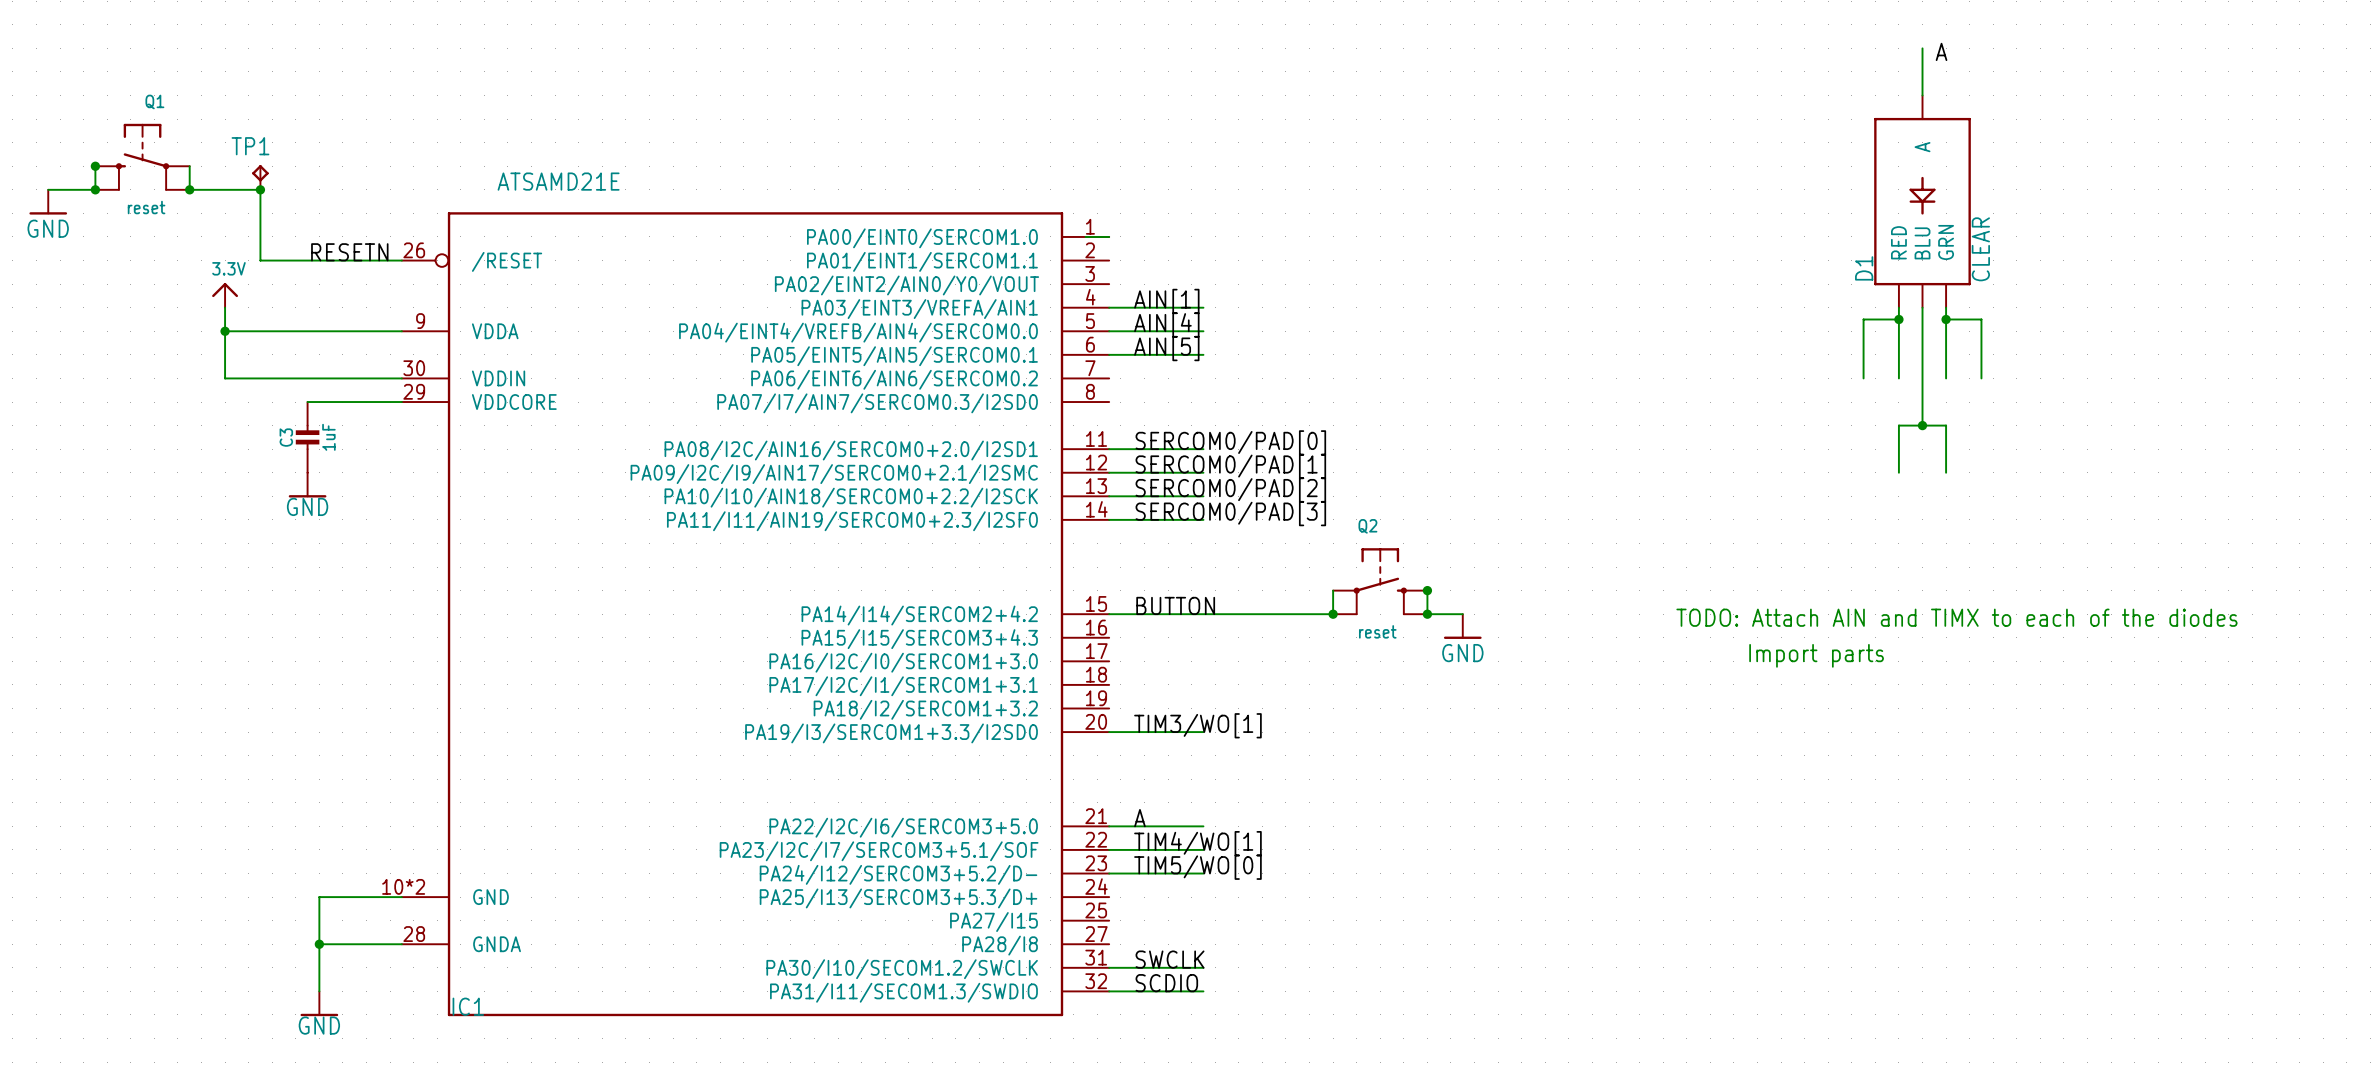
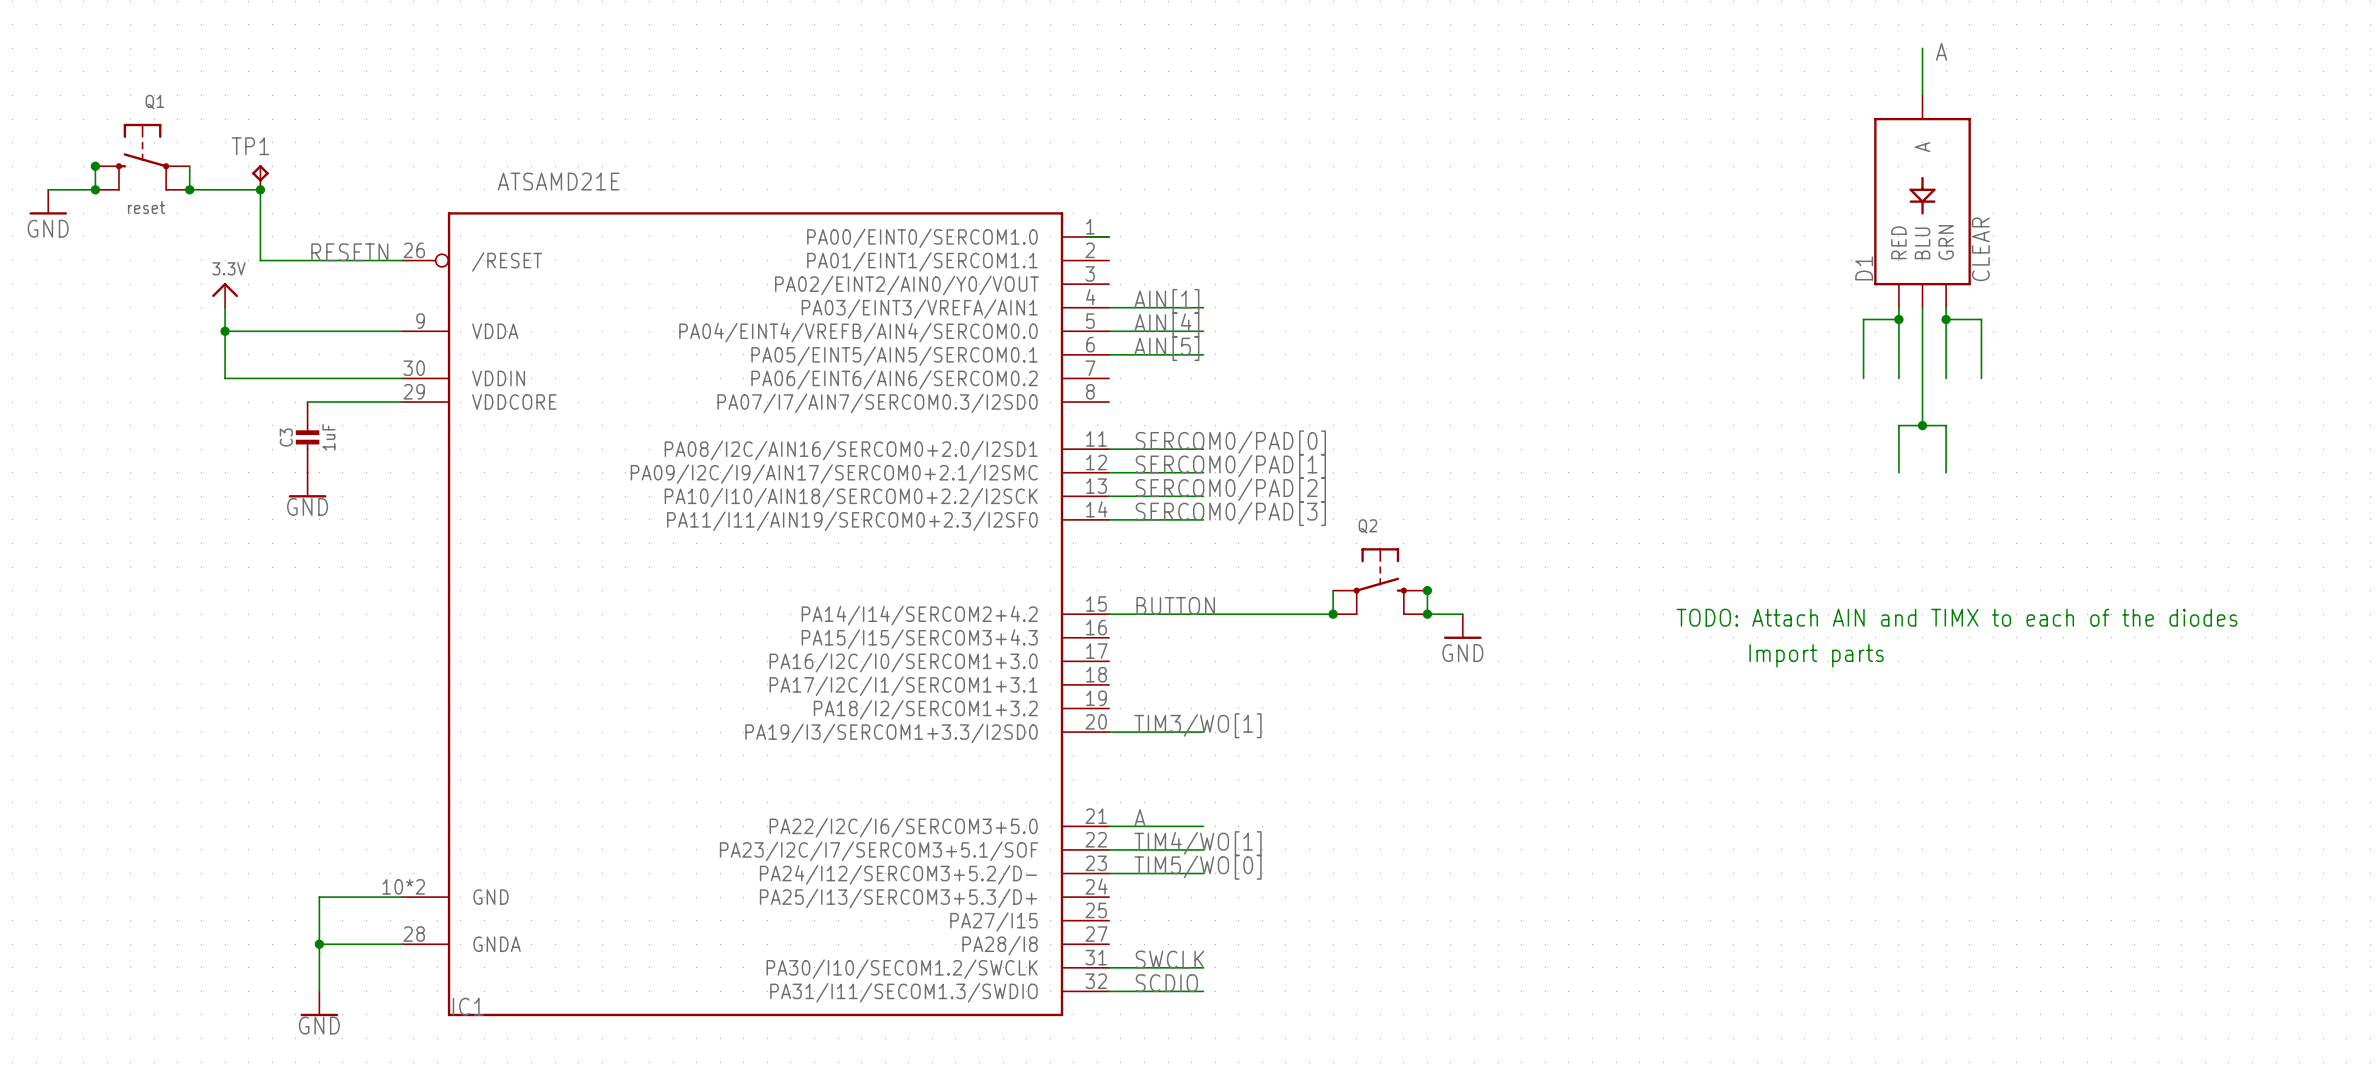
Q2 value: reset (1377, 631) -> none

